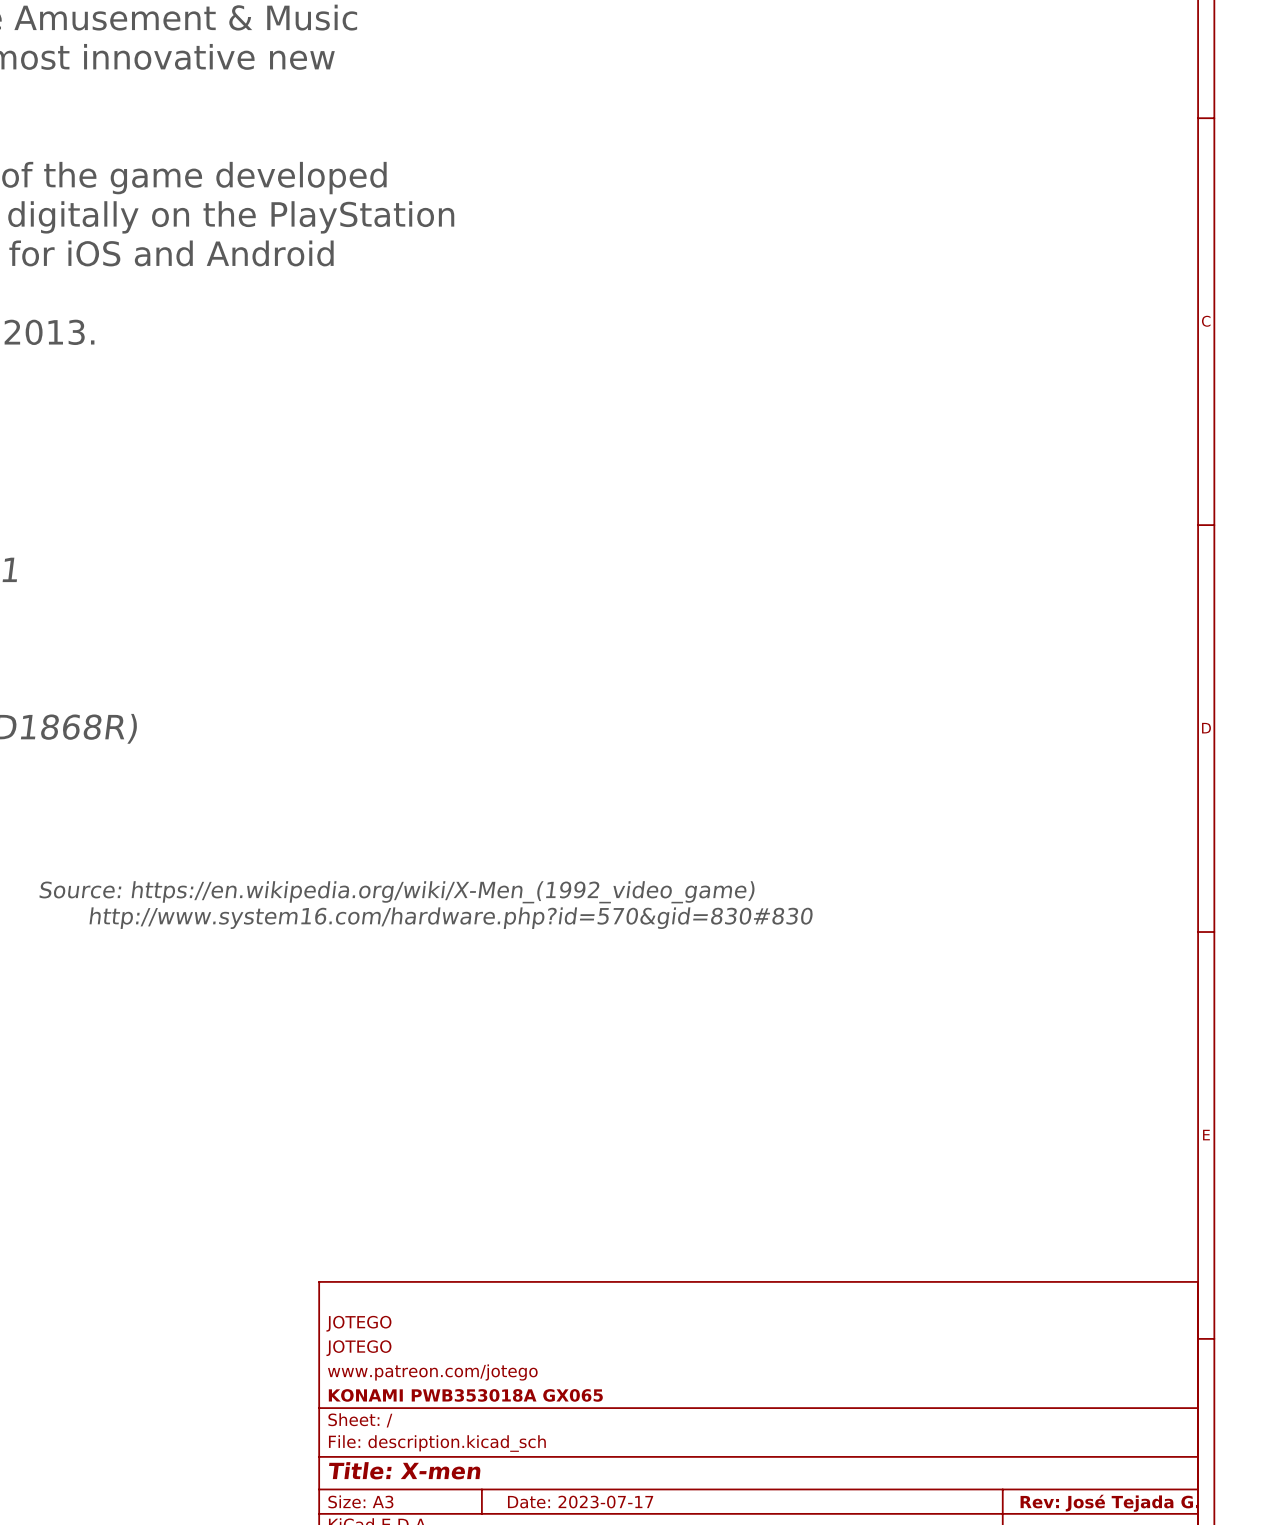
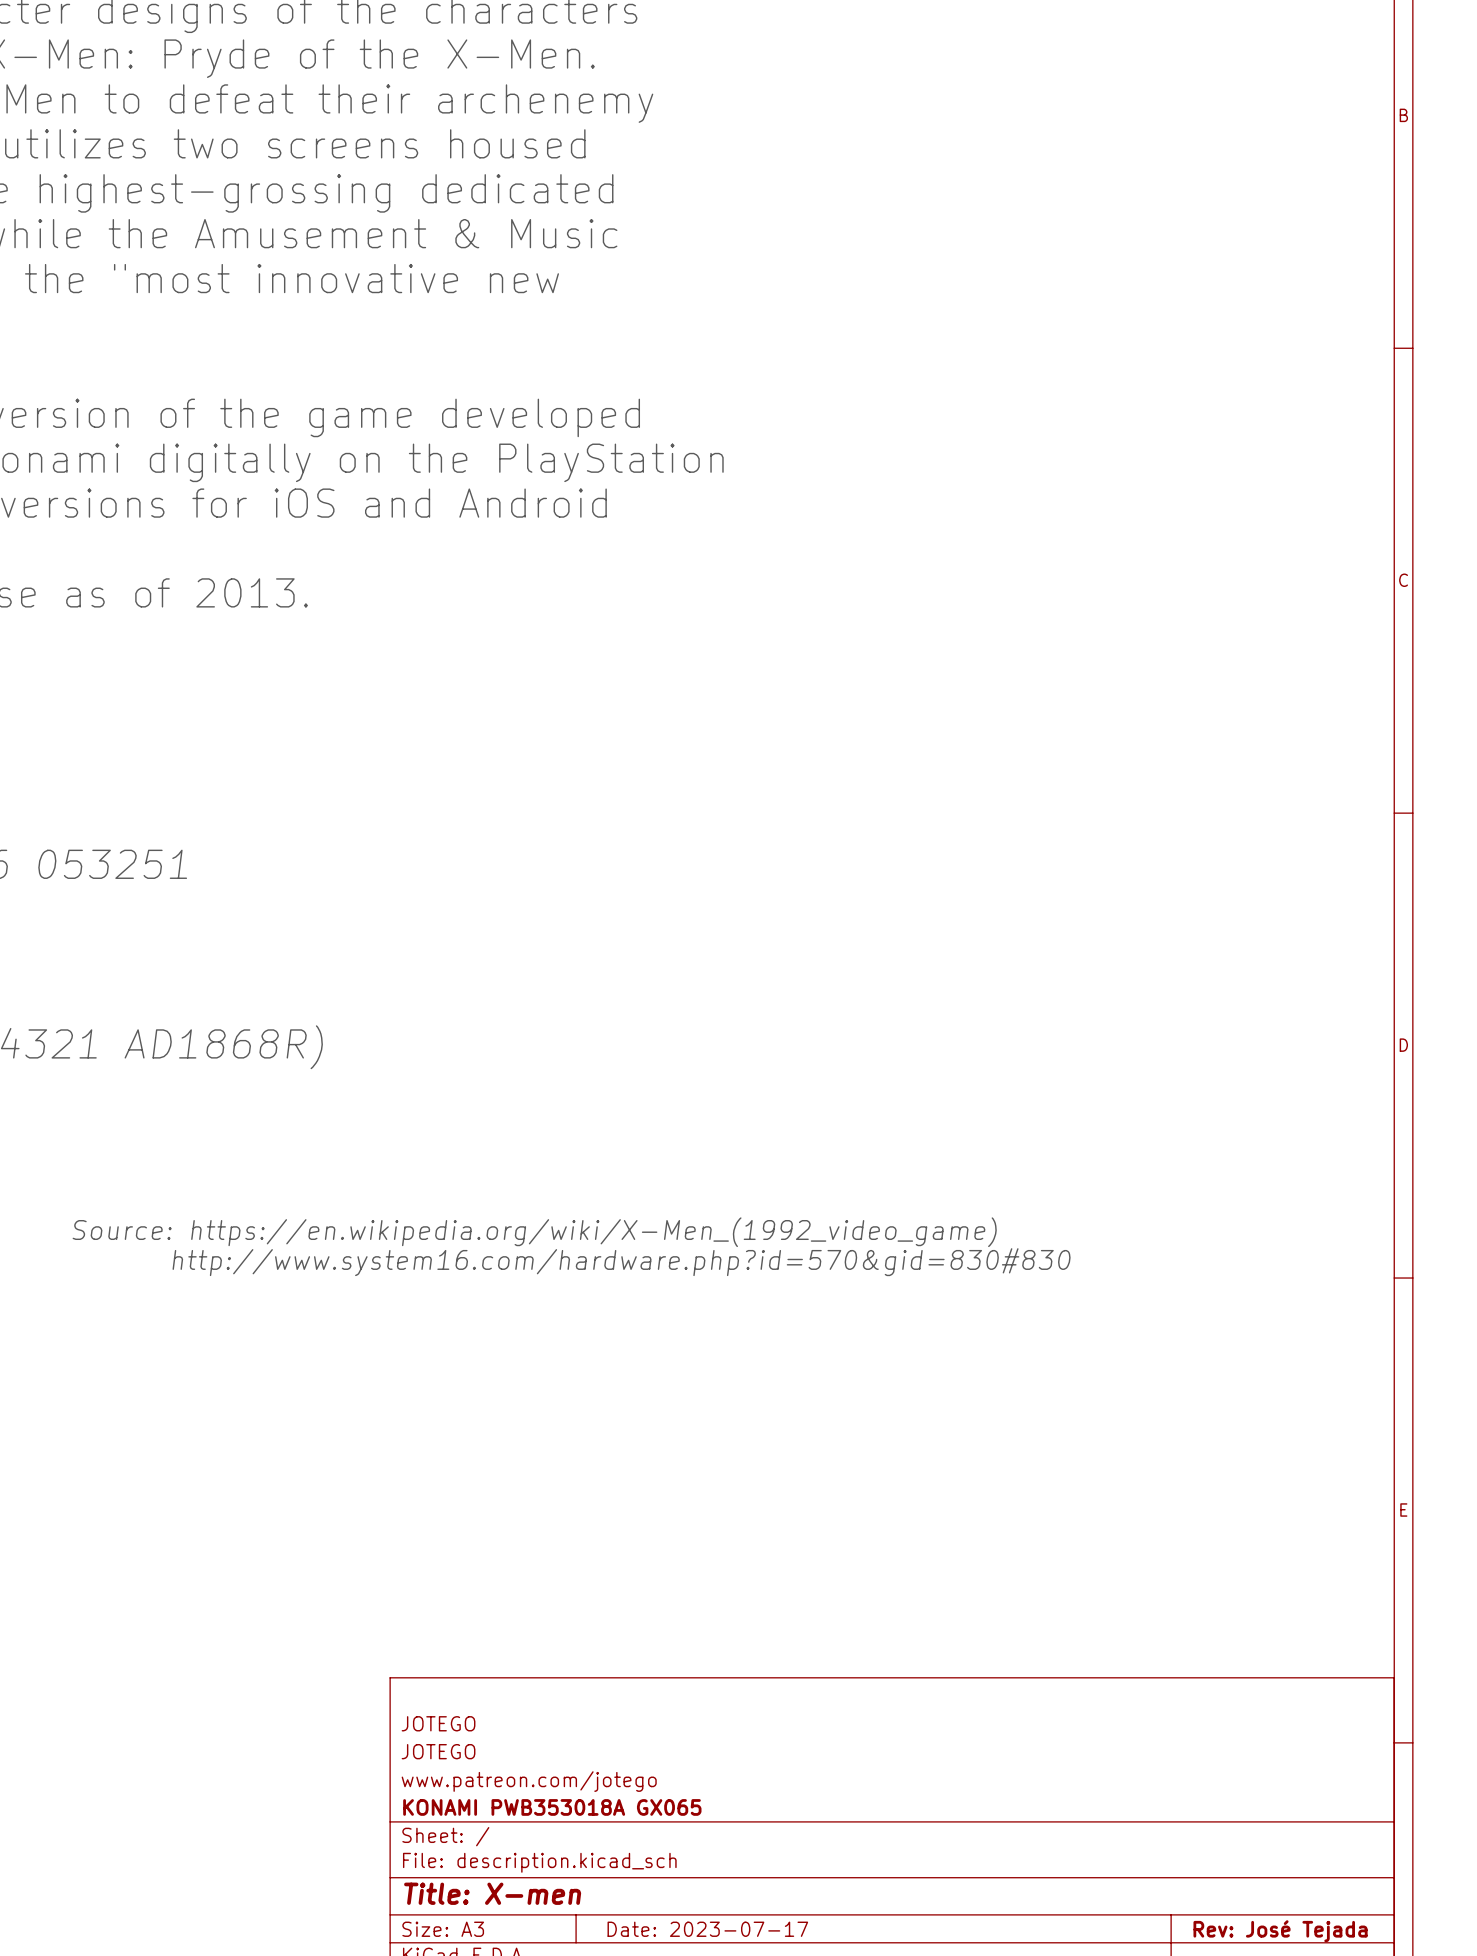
title block: Rev: José Tejada G. (1109, 1503) -> Rev: José Tejada (1280, 1931)

